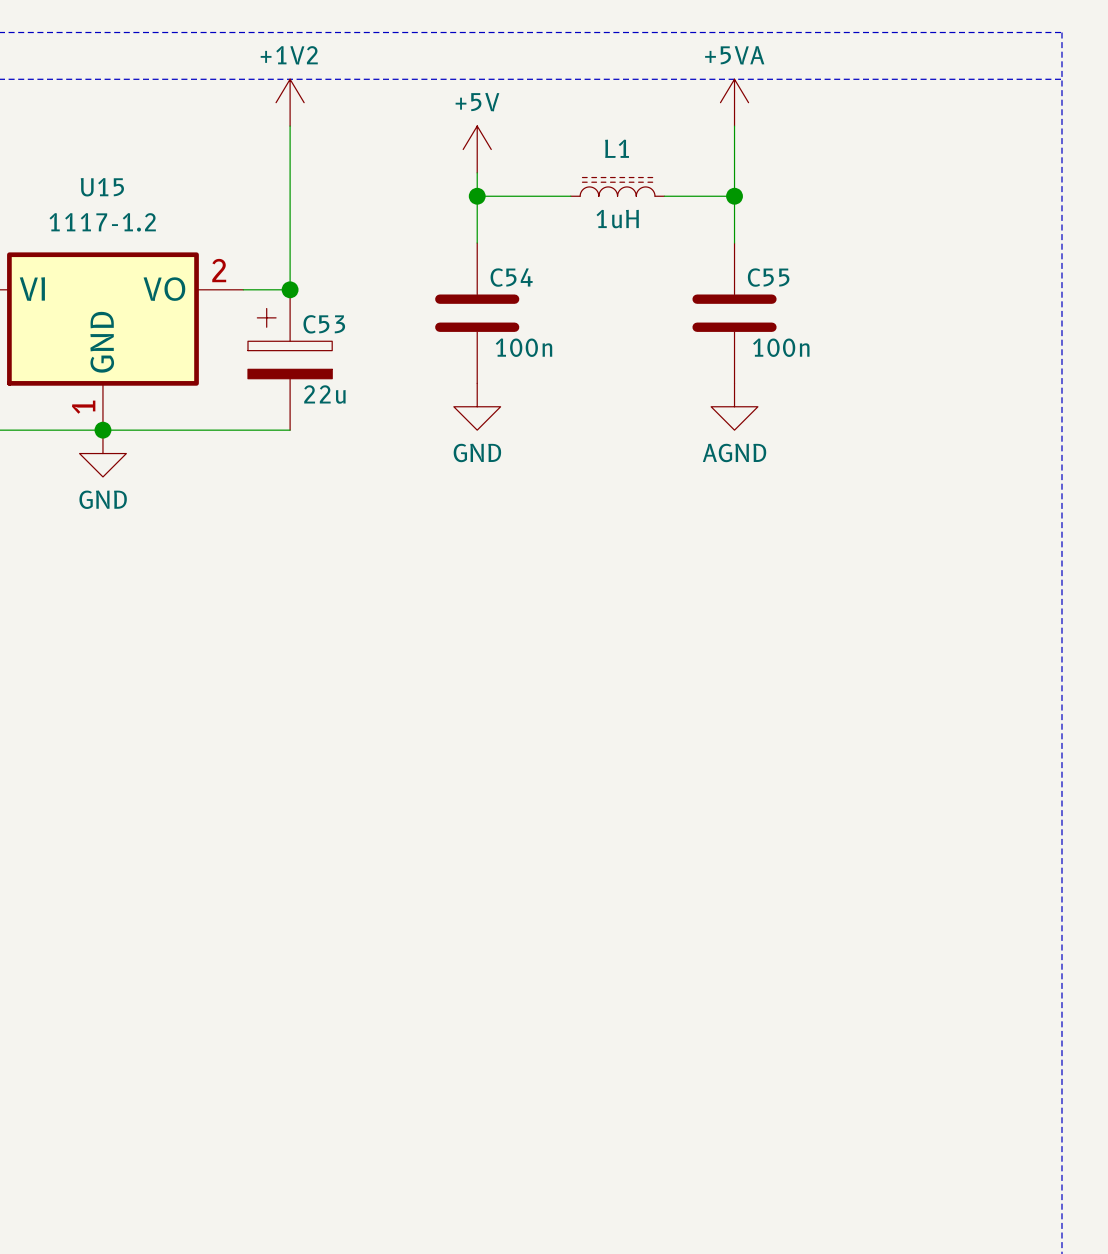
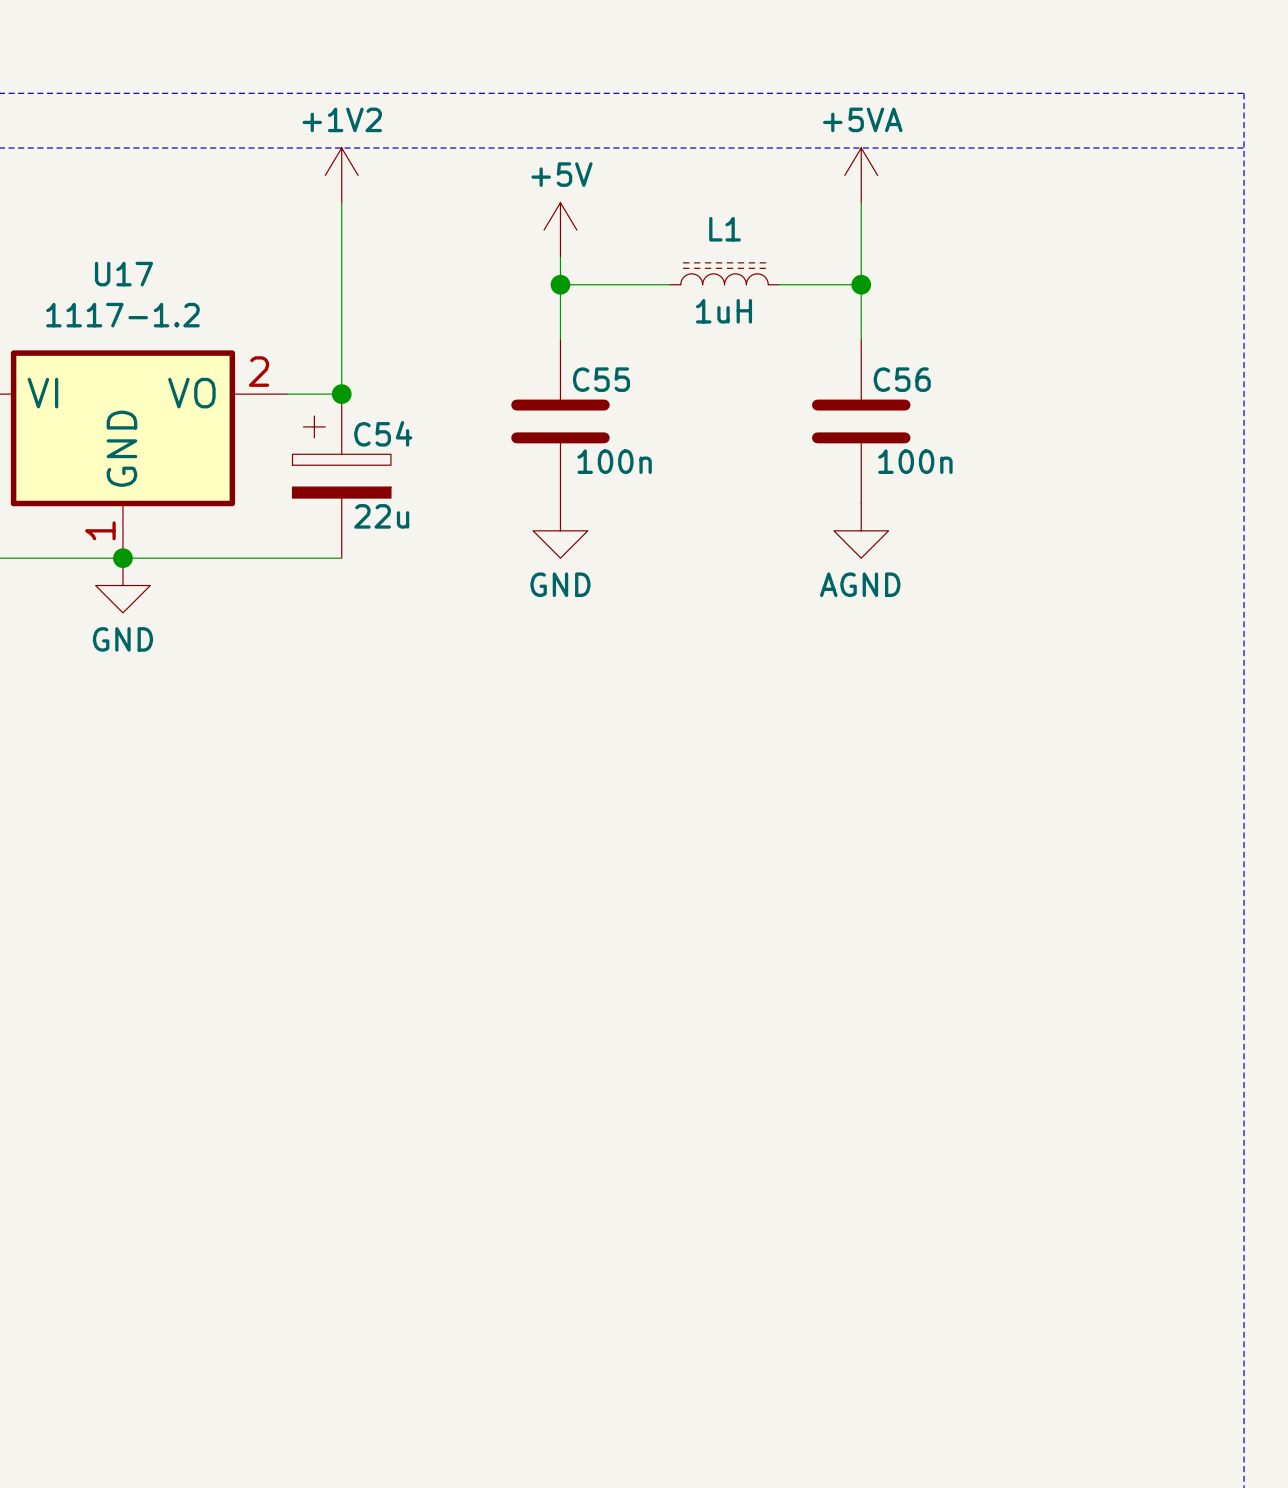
U15 name: U15 (102, 187) -> U17 (123, 274)
C54 name: C54 (511, 277) -> C55 (601, 379)
C55 name: C55 (768, 277) -> C56 (902, 379)
C53 name: C53 (324, 324) -> C54 (383, 433)

